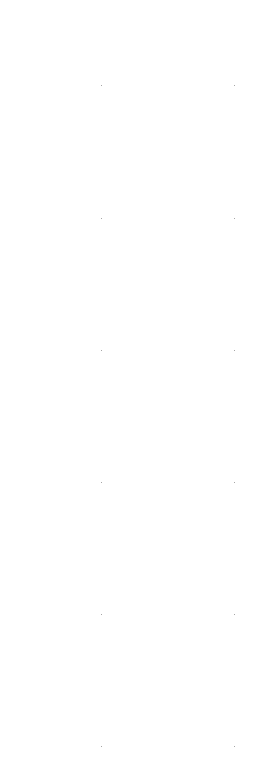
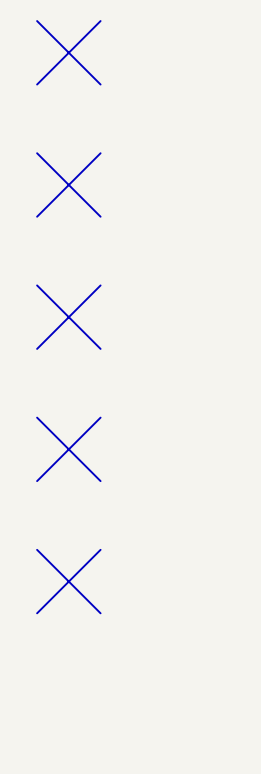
no-connect mark: none -> (68, 52)
no-connect mark: none -> (68, 184)
no-connect mark: none -> (68, 317)
no-connect mark: none -> (68, 449)
no-connect mark: none -> (68, 581)

